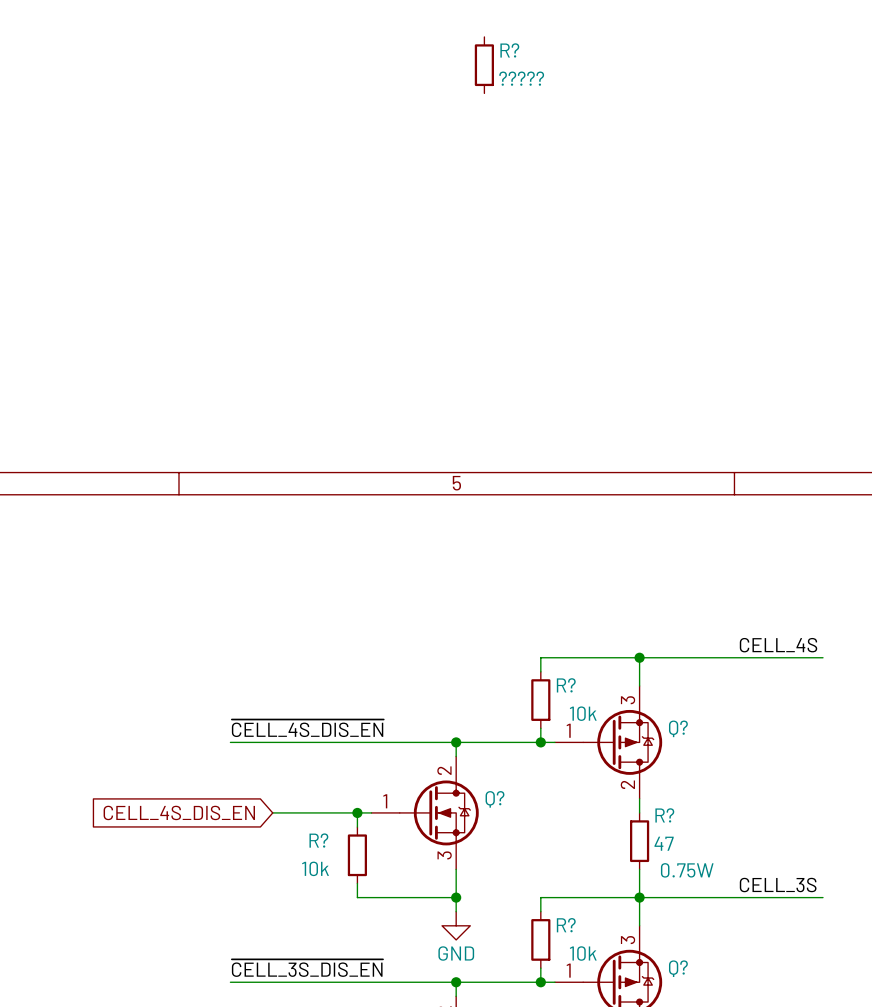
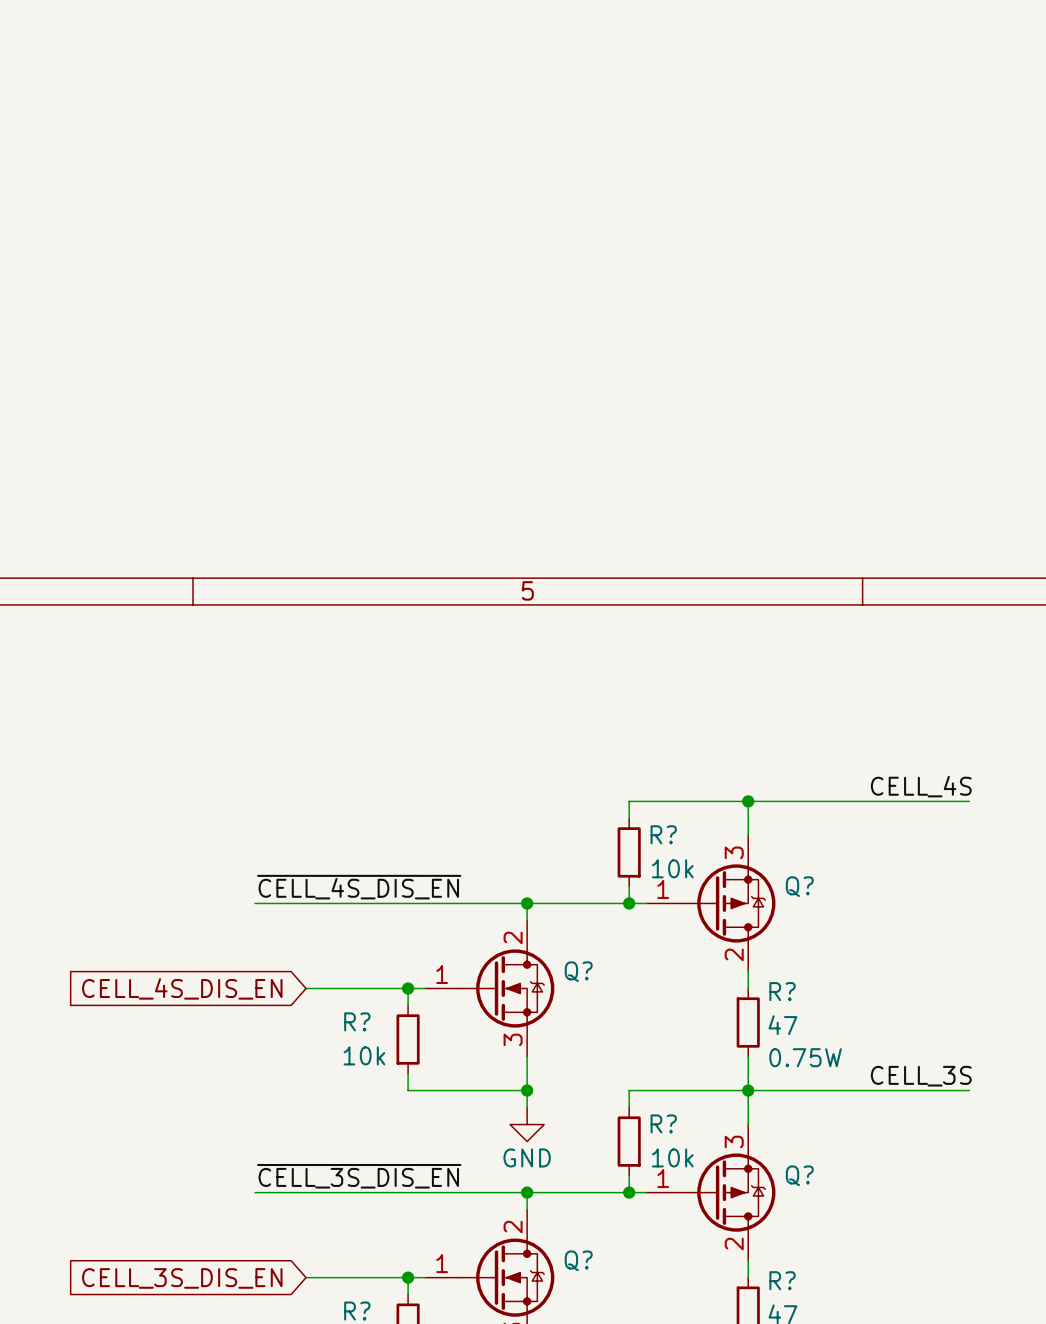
R?: ????? (484, 65) -> none

